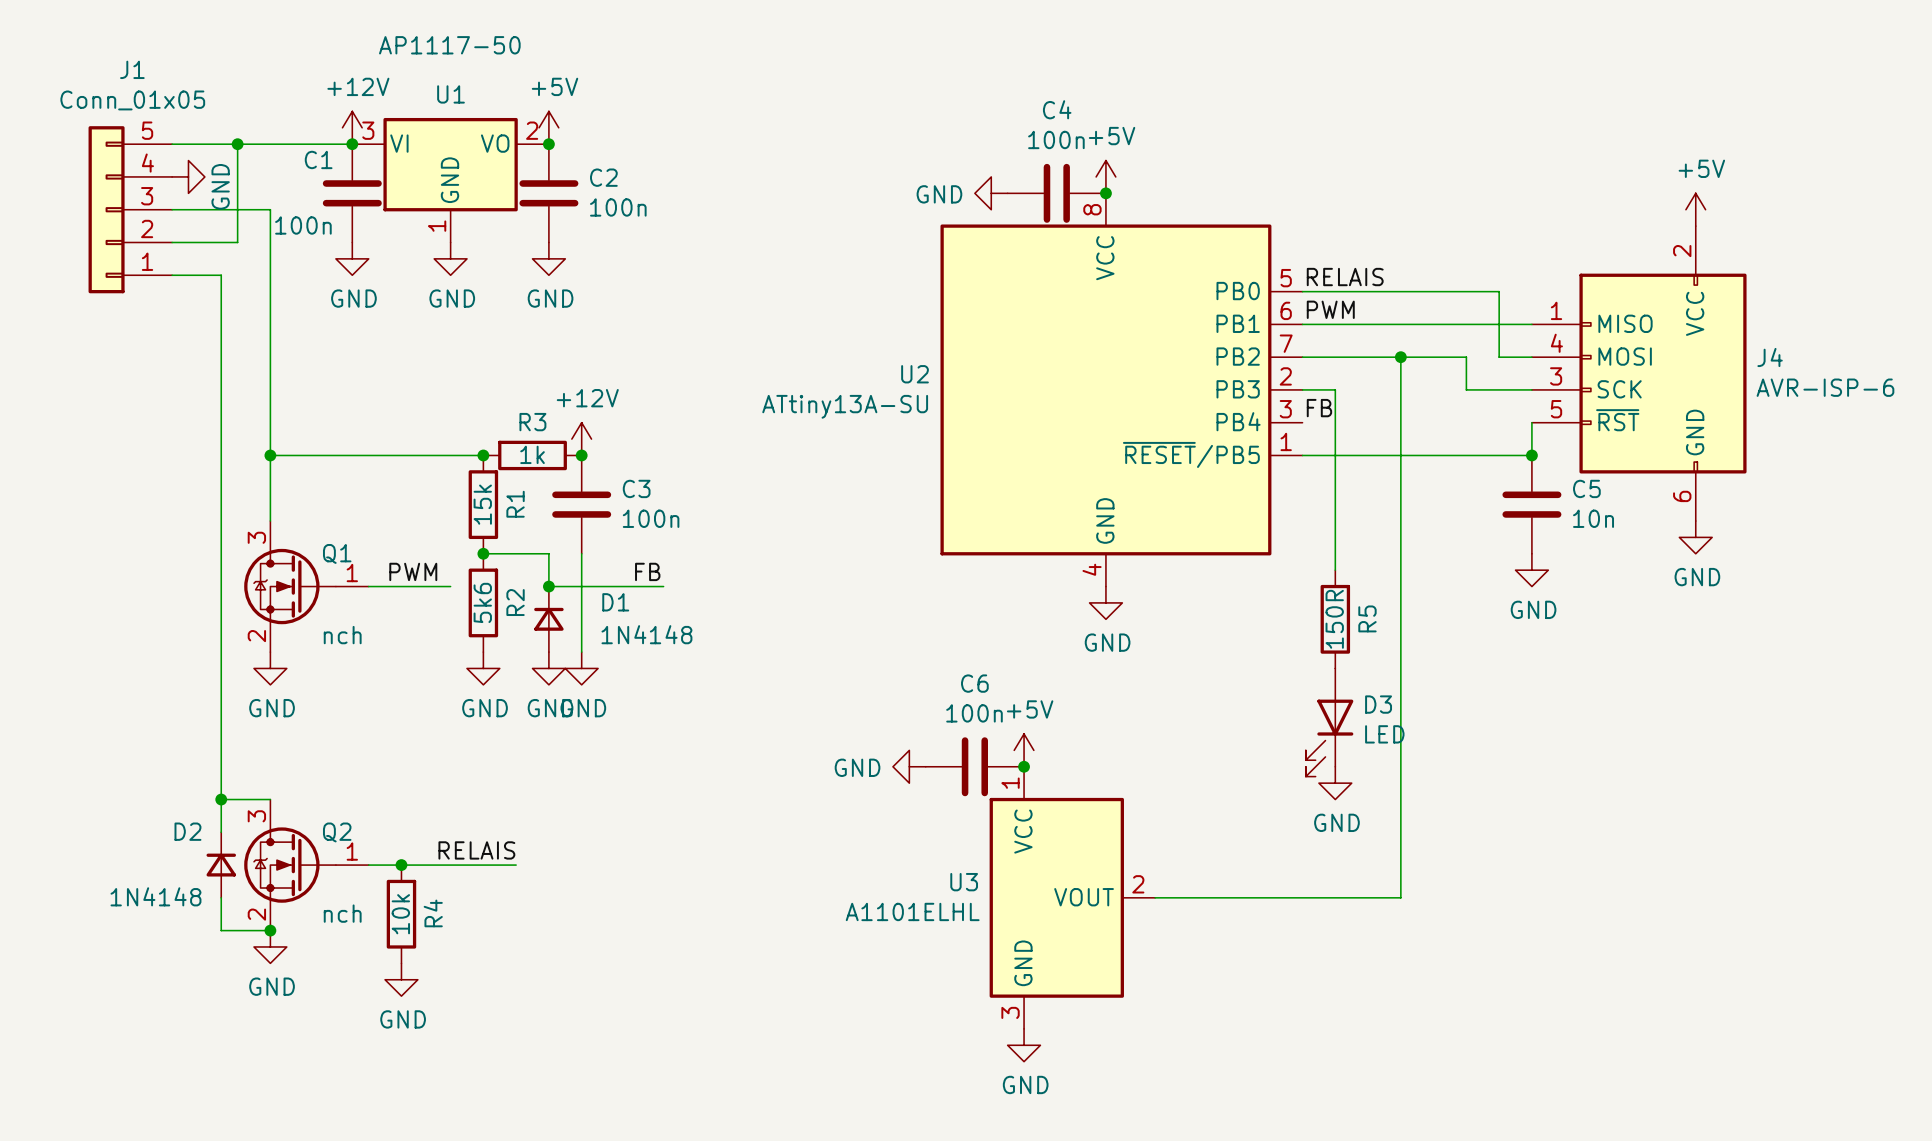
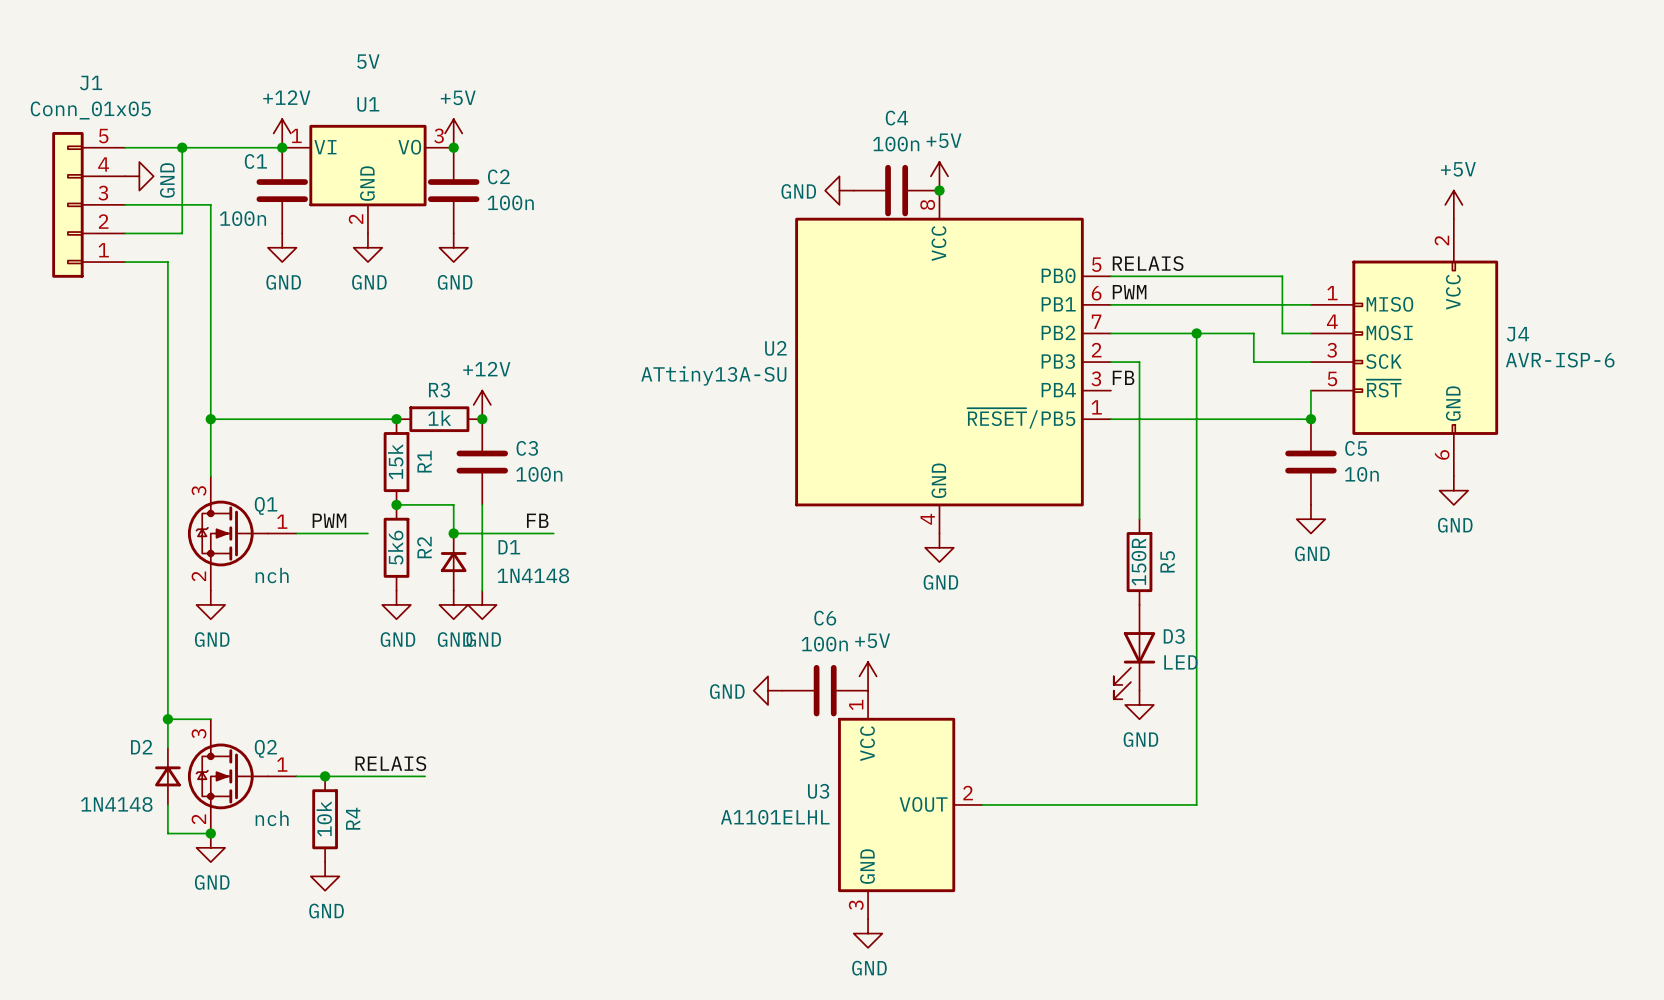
U1 value: AP1117-50 (449, 45) -> 5V (368, 61)
U1 pin number: 3 (368, 130) -> 1 (296, 135)
U1 pin number: 2 (532, 130) -> 3 (439, 135)
U1 pin number: 1 (437, 226) -> 2 (356, 219)
junction: (1024, 766) -> none

